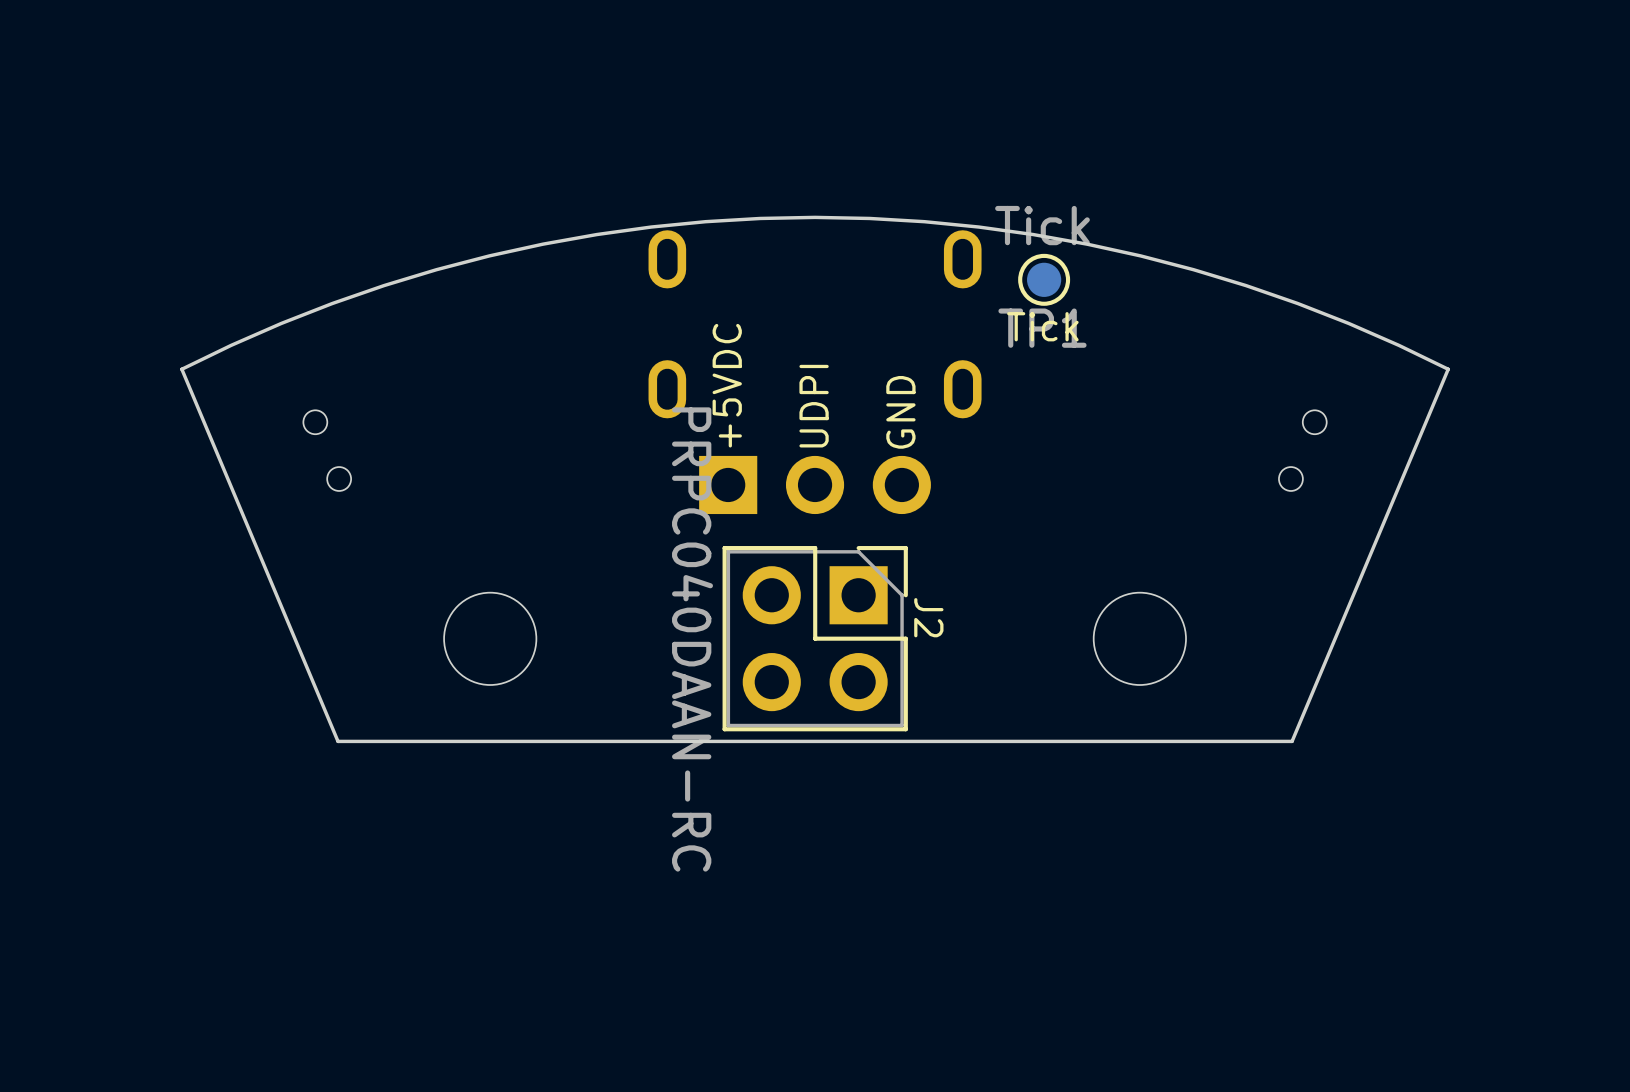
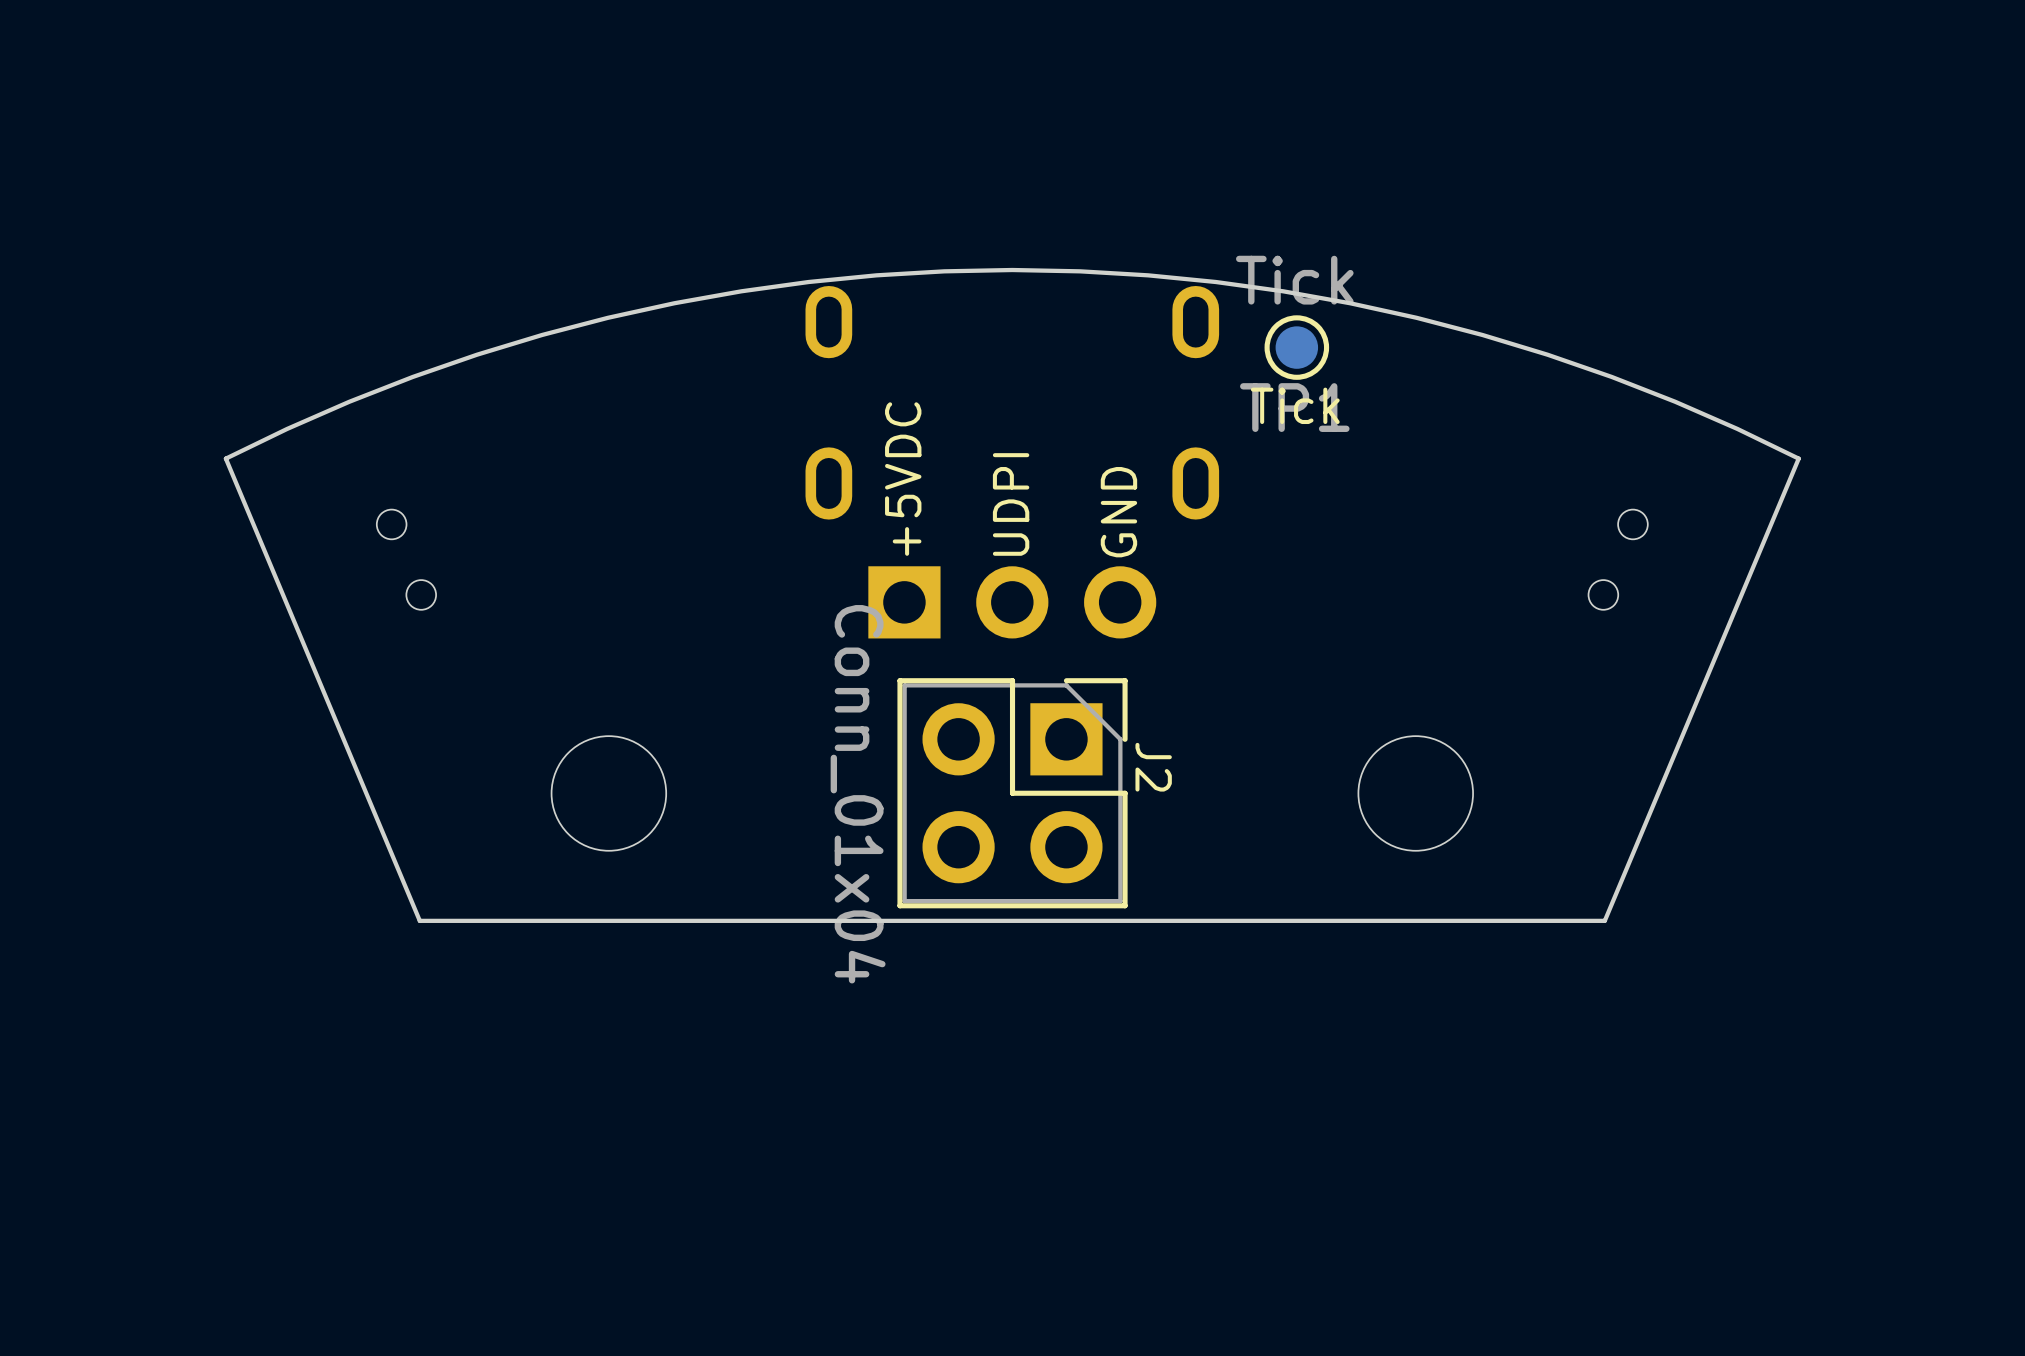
J2 value: PRPC040DAAN-RC (692, 639) -> Conn_01x04 (858, 794)

